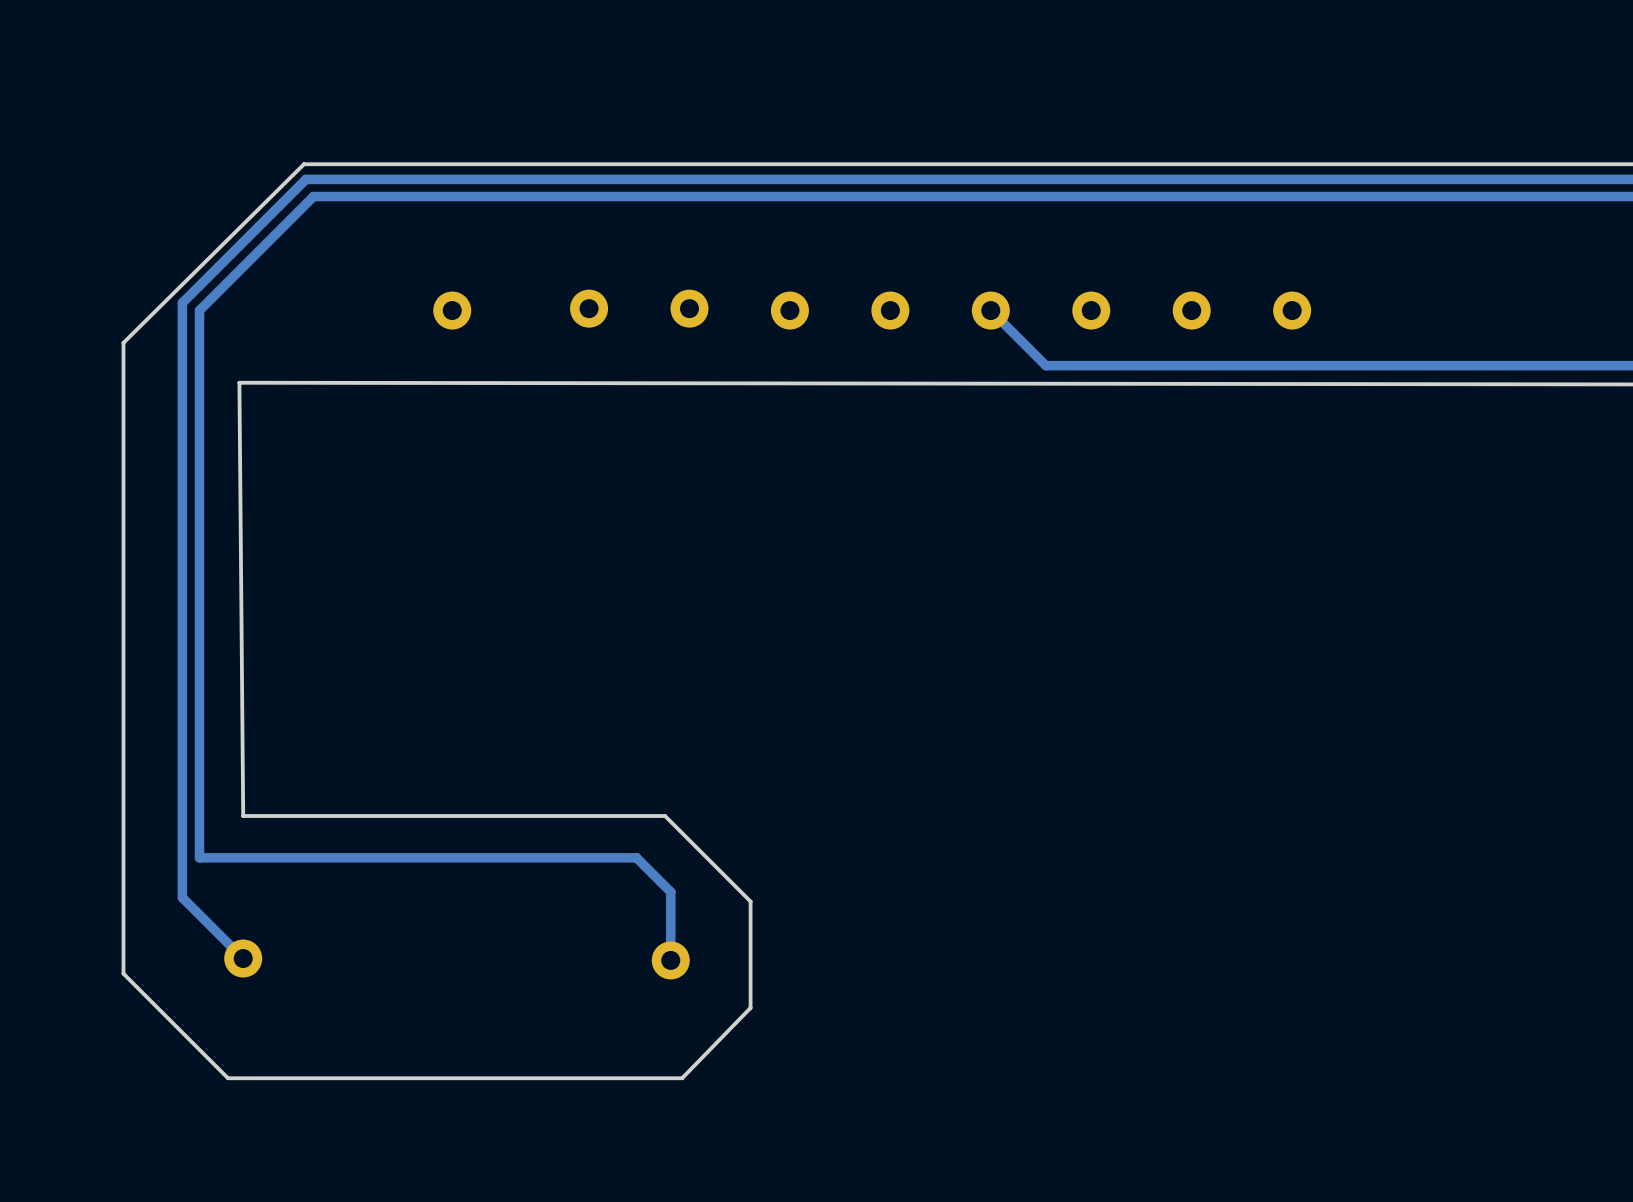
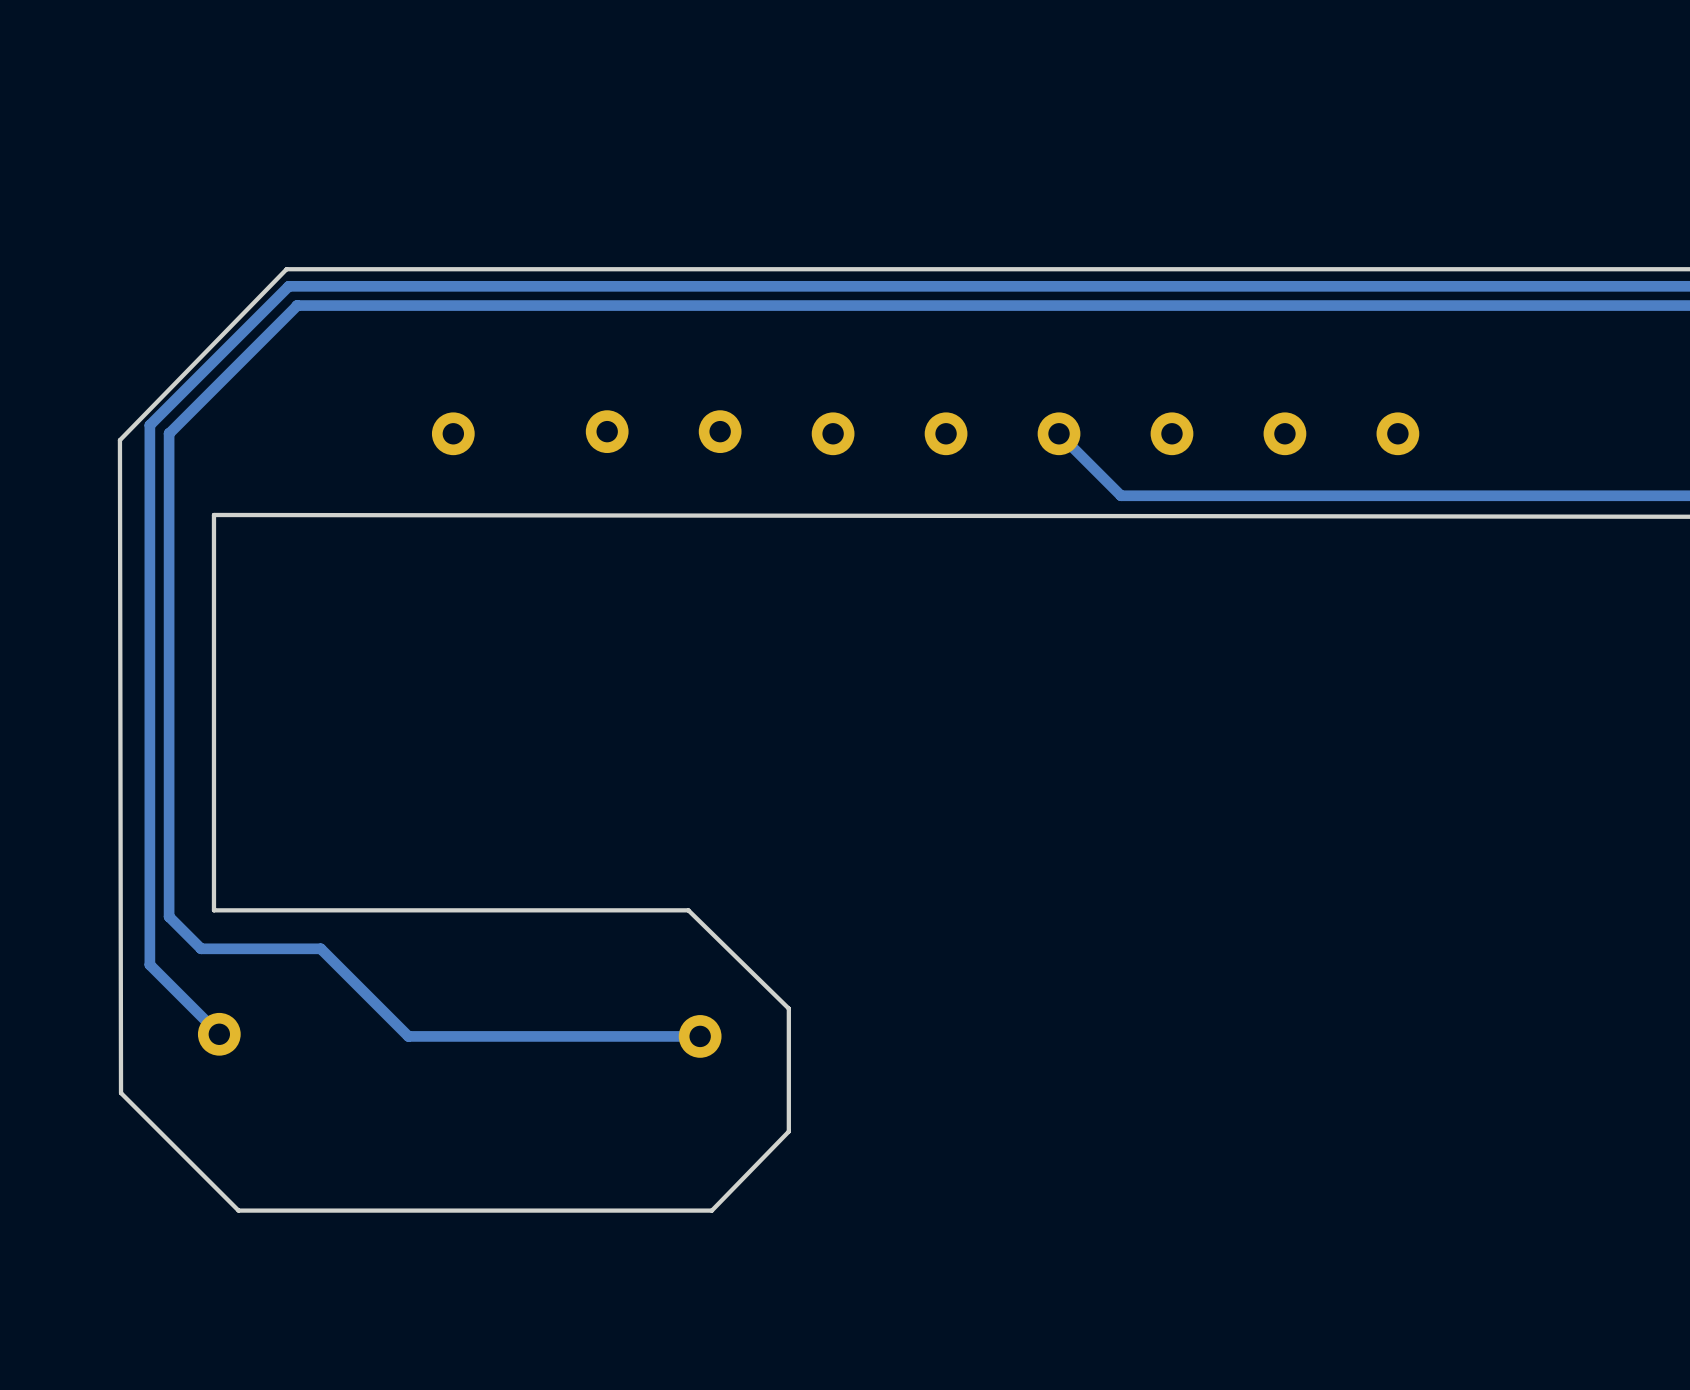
board edge: (304, 164) (123, 342) (123, 973) (228, 1078) (682, 1078) (750, 1007) (750, 930) -> (286, 269) (119, 440) (121, 1093) (238, 1210) (711, 1210) (788, 1131)
board edge: (239, 382) (243, 816) (665, 816) (750, 901) -> (213, 514) (213, 910) (688, 910) (788, 1008) (788, 1098)
track: (199, 740) (199, 857) (636, 857) (670, 892) (670, 960) -> (169, 916) (201, 948) (320, 948) (408, 1036) (700, 1036)
track: (182, 782) (182, 897) (243, 958) -> (149, 964) (219, 1034)
part position: (243, 958) -> (219, 1034)
part position: (670, 960) -> (700, 1036)

